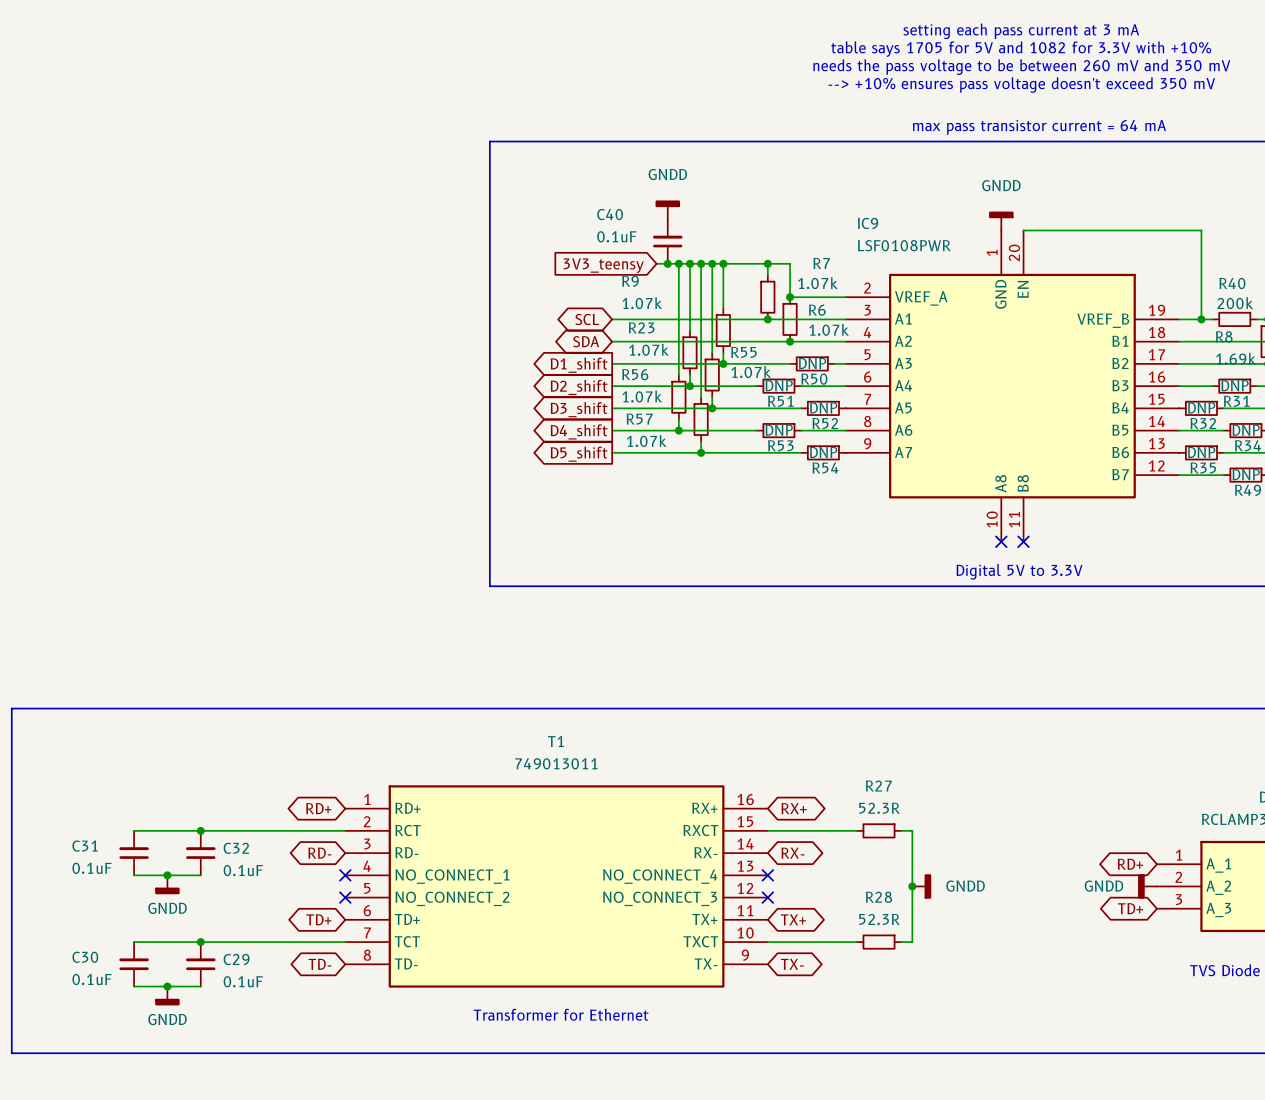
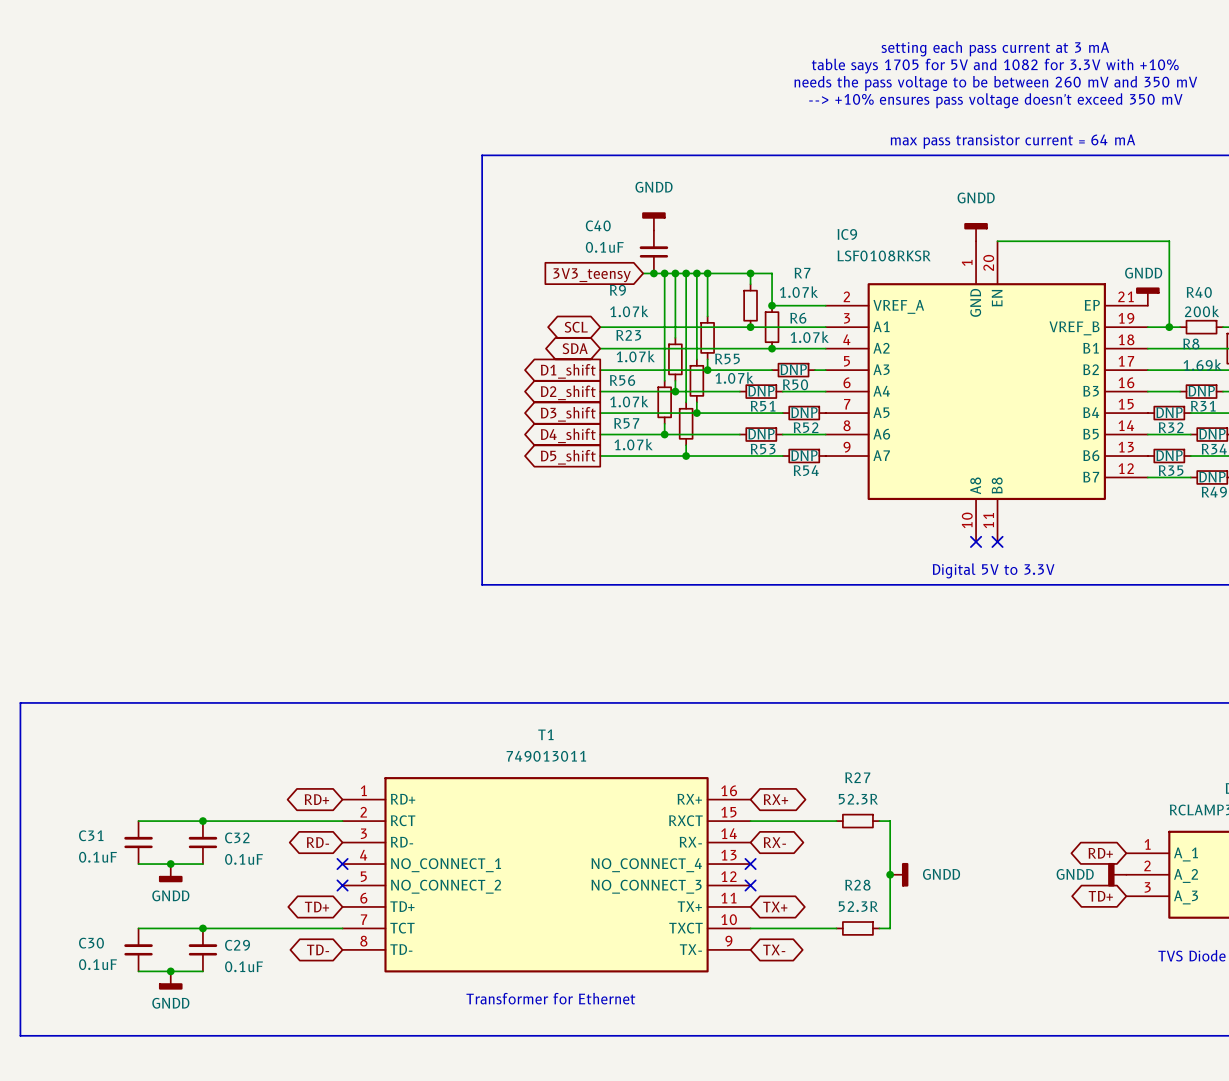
IC9 symbol: [845, 230, 1180, 542] -> [825, 241, 1148, 542]
IC9 value: LSF0108PWR (904, 245) -> LSF0108RKSR (884, 255)
power symbol: none -> GNDD (1147, 296)

